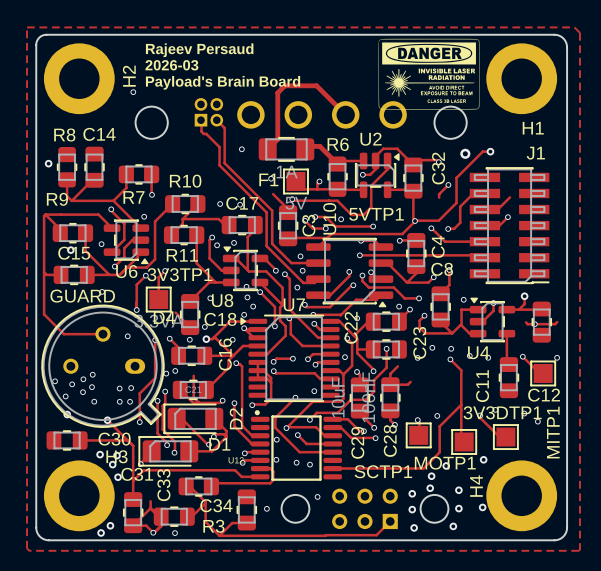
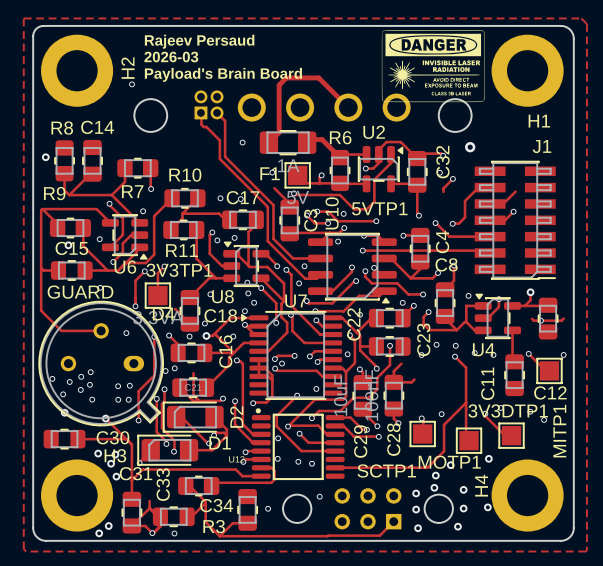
track: (490, 151) (482, 151) (456, 177) (456, 202) (438, 220) (415, 220) -> none
via: (490, 151) -> none
via: none -> (439, 172)
track: (415, 220) (402, 234) (331, 234) (327, 237) -> (344, 228) (339, 232) (329, 232)
via: none -> (344, 228)
via: none -> (338, 241)
via: (300, 256) -> none
via: none -> (282, 363)

